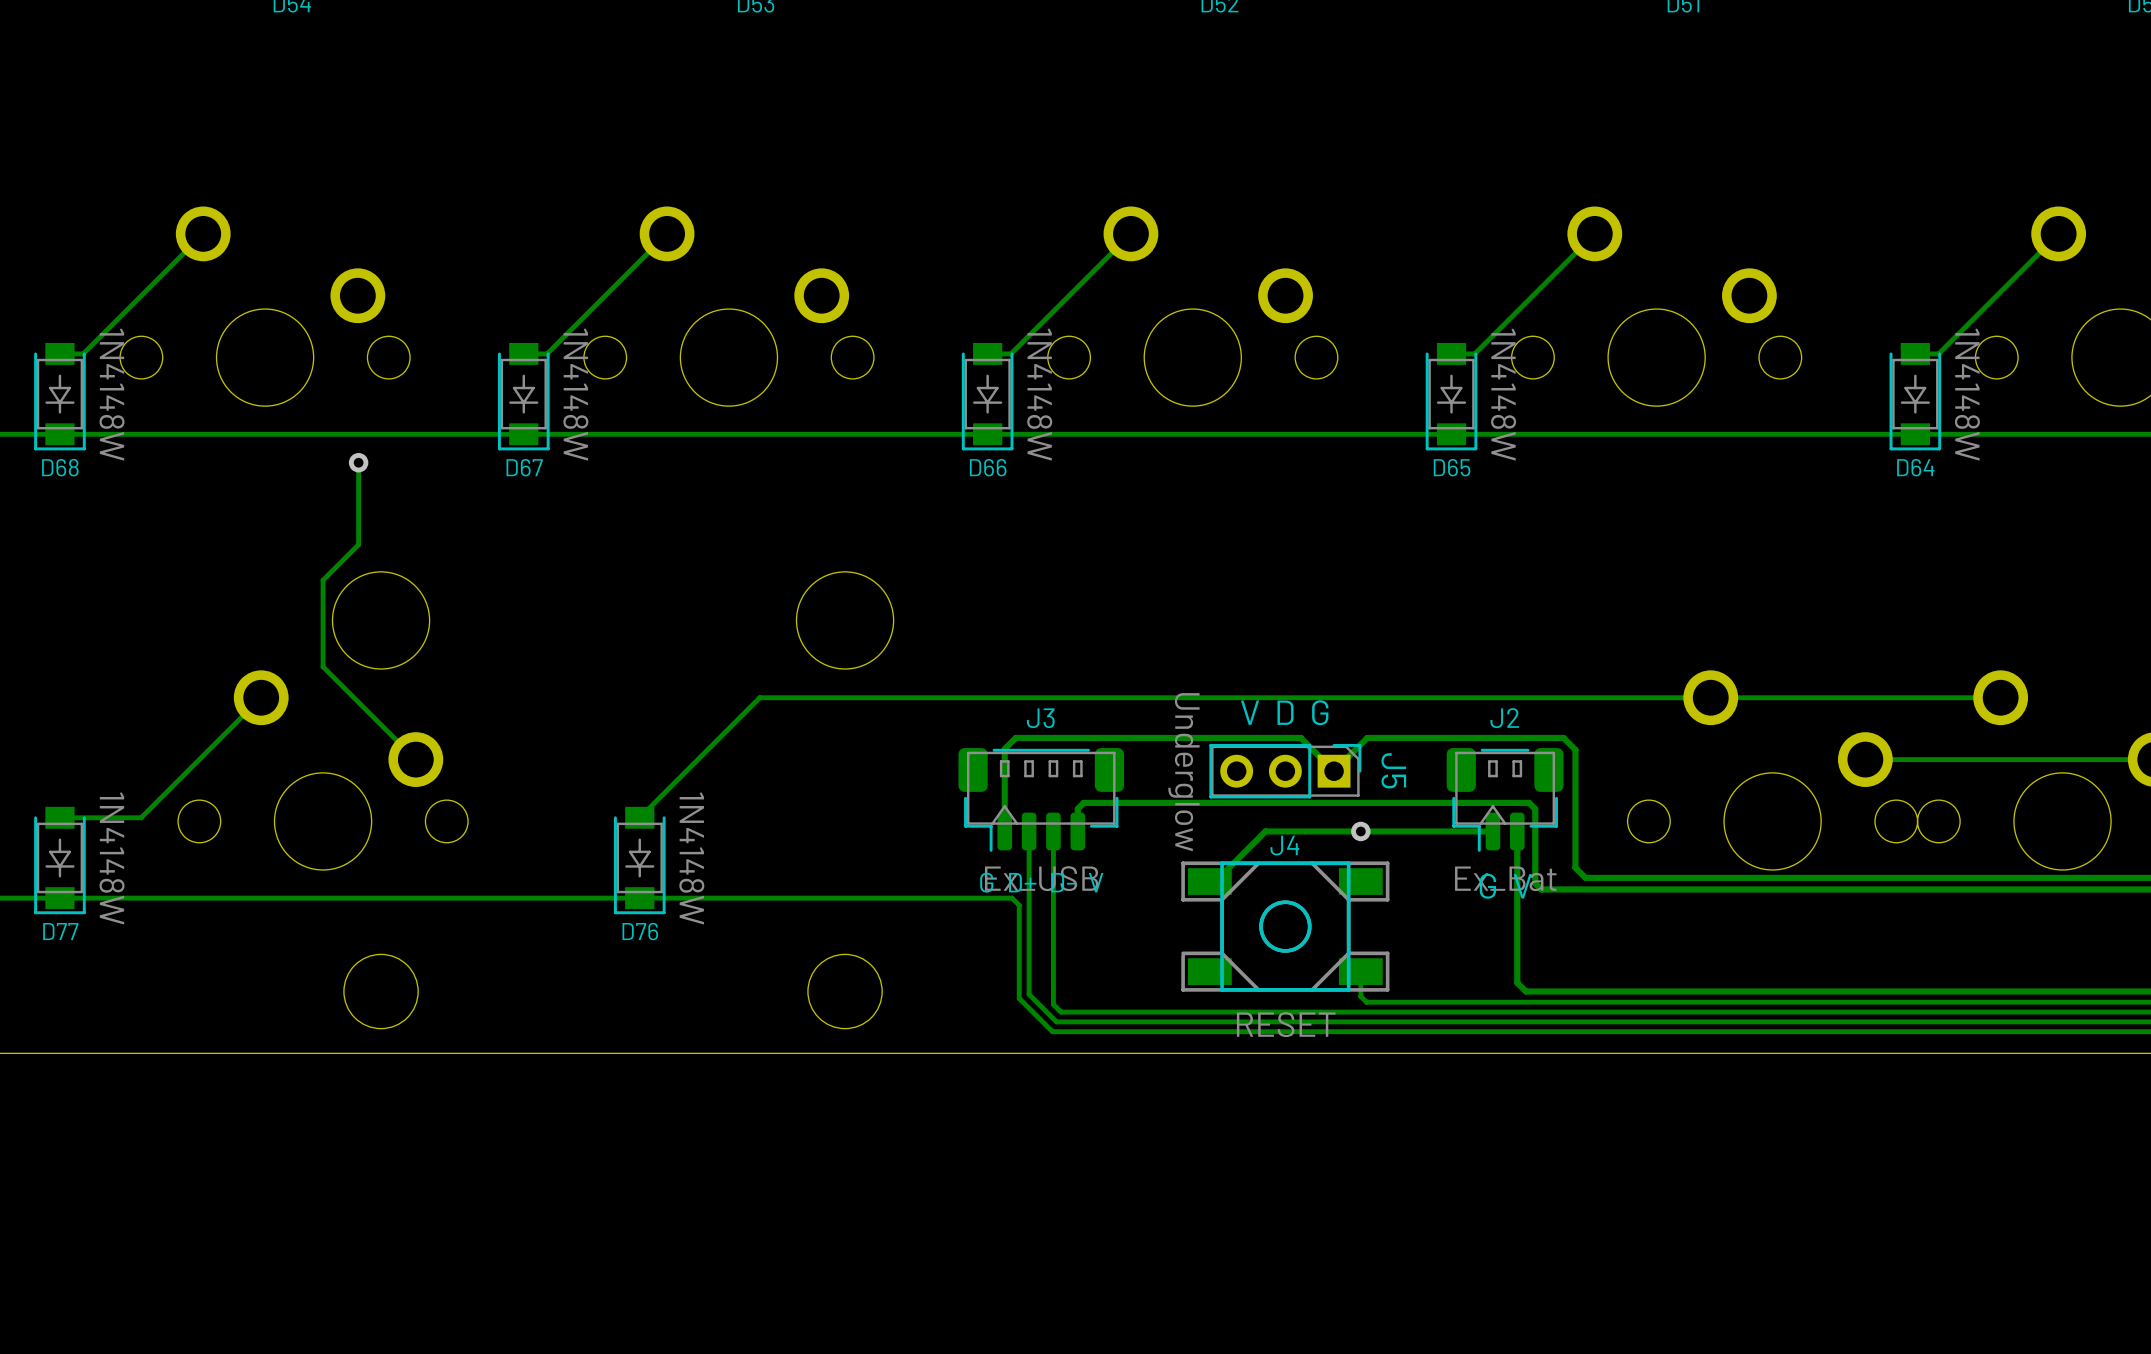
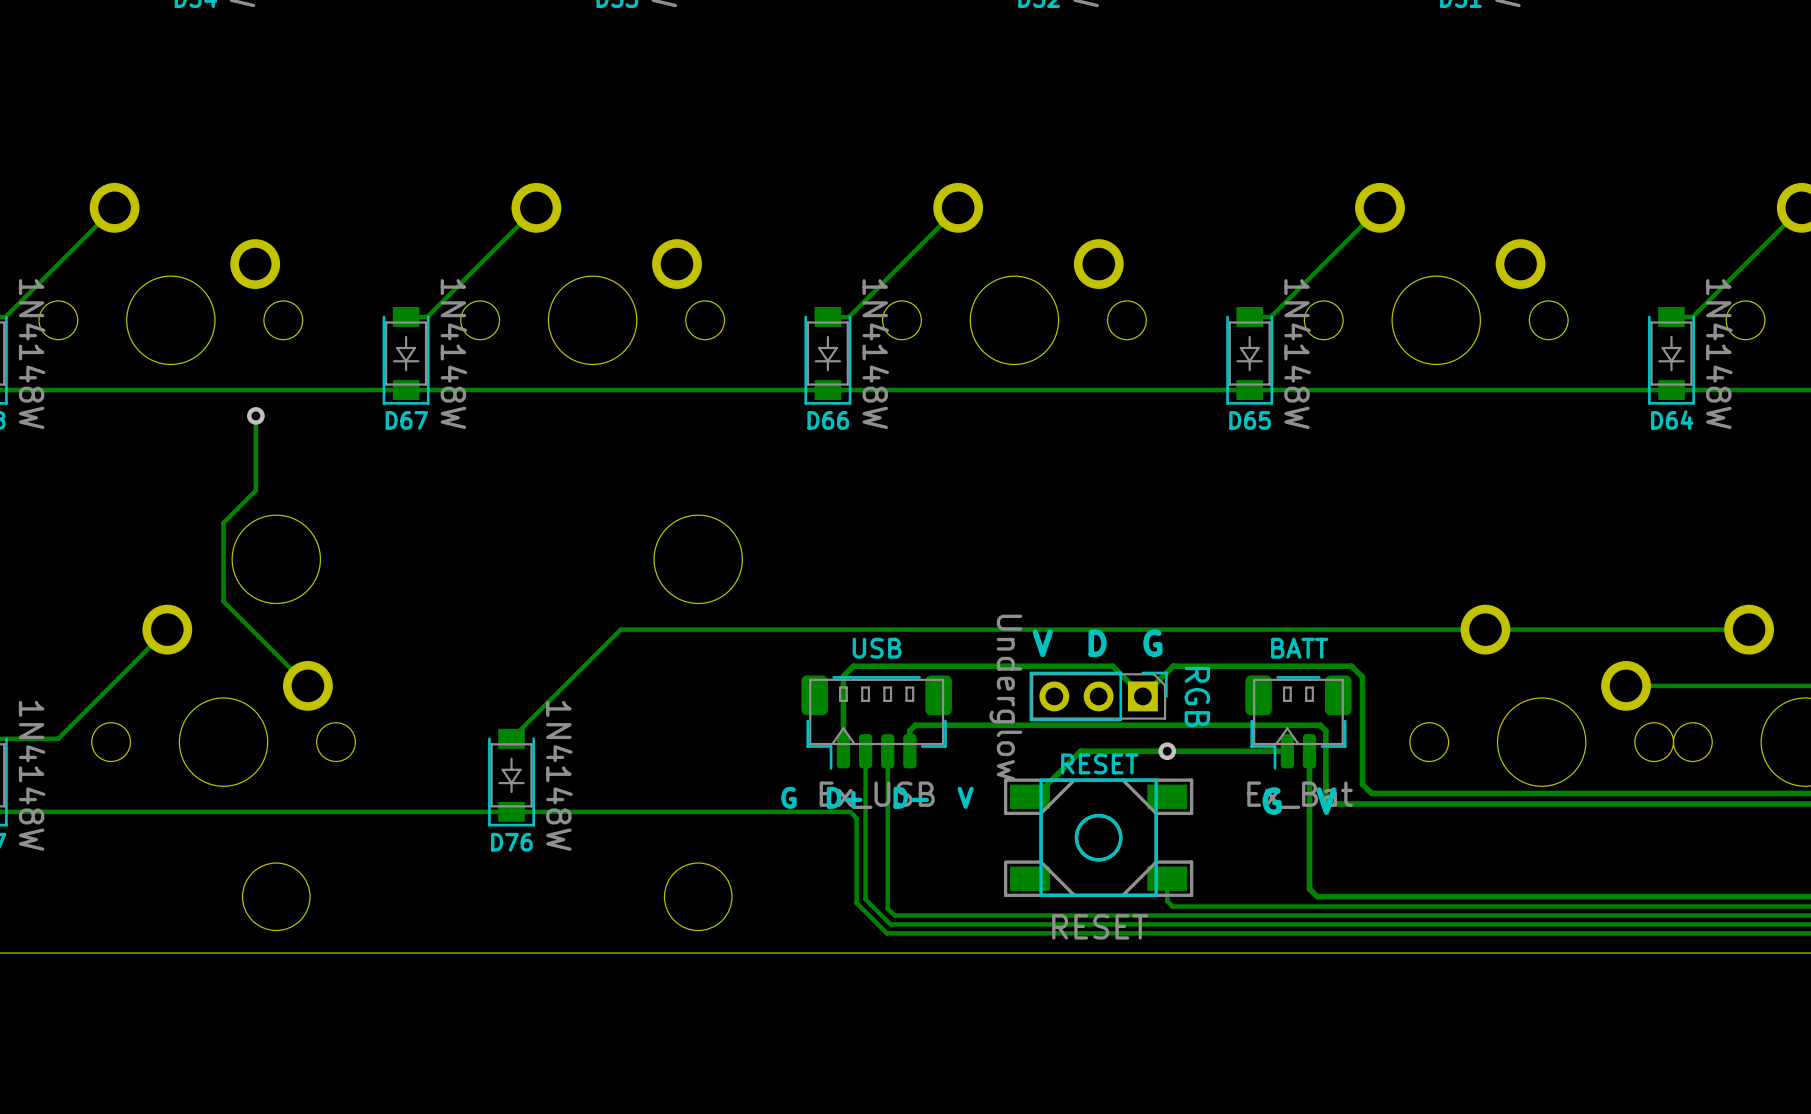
J3 name: J3 (1040, 718) -> USB (877, 648)
J2 name: J2 (1504, 718) -> BATT (1299, 648)
J5 name: J5 (1393, 770) -> RGB (1197, 696)
J4 name: J4 (1284, 845) -> RESET (1099, 763)

